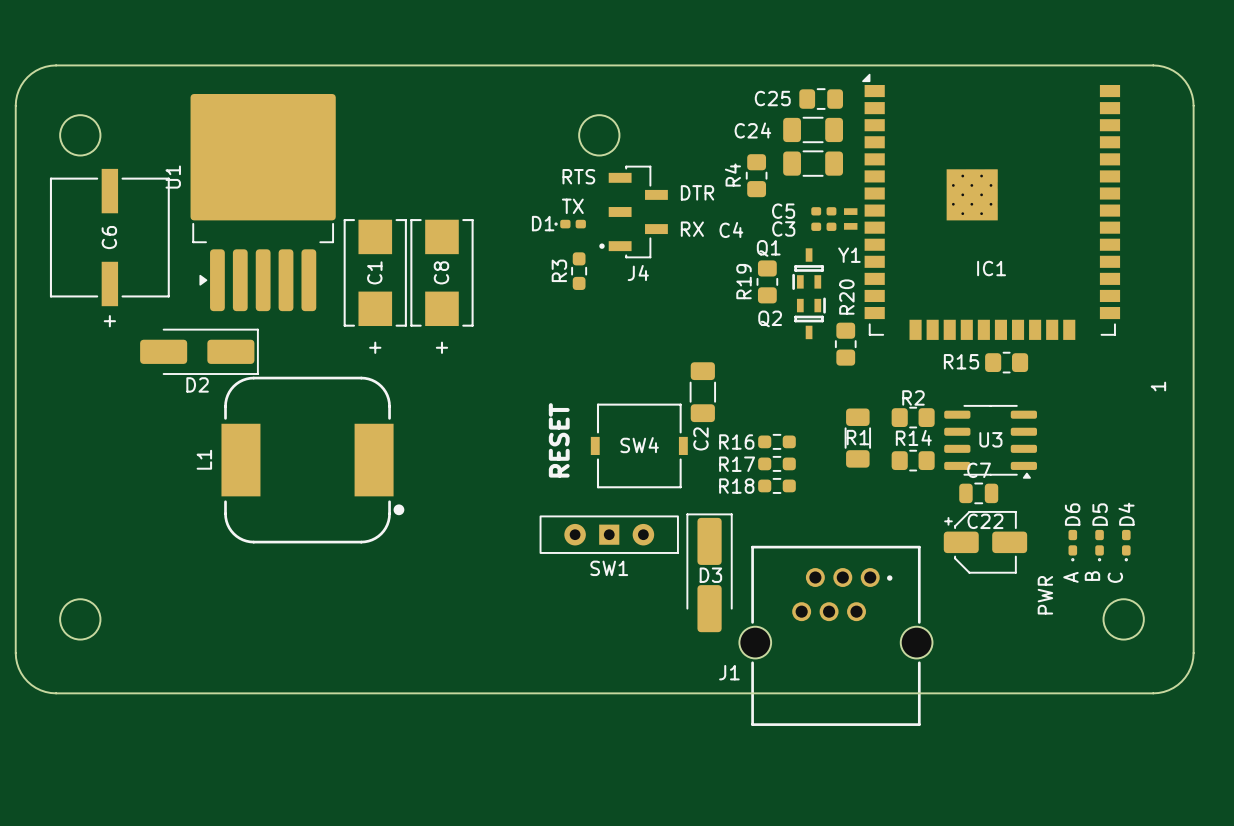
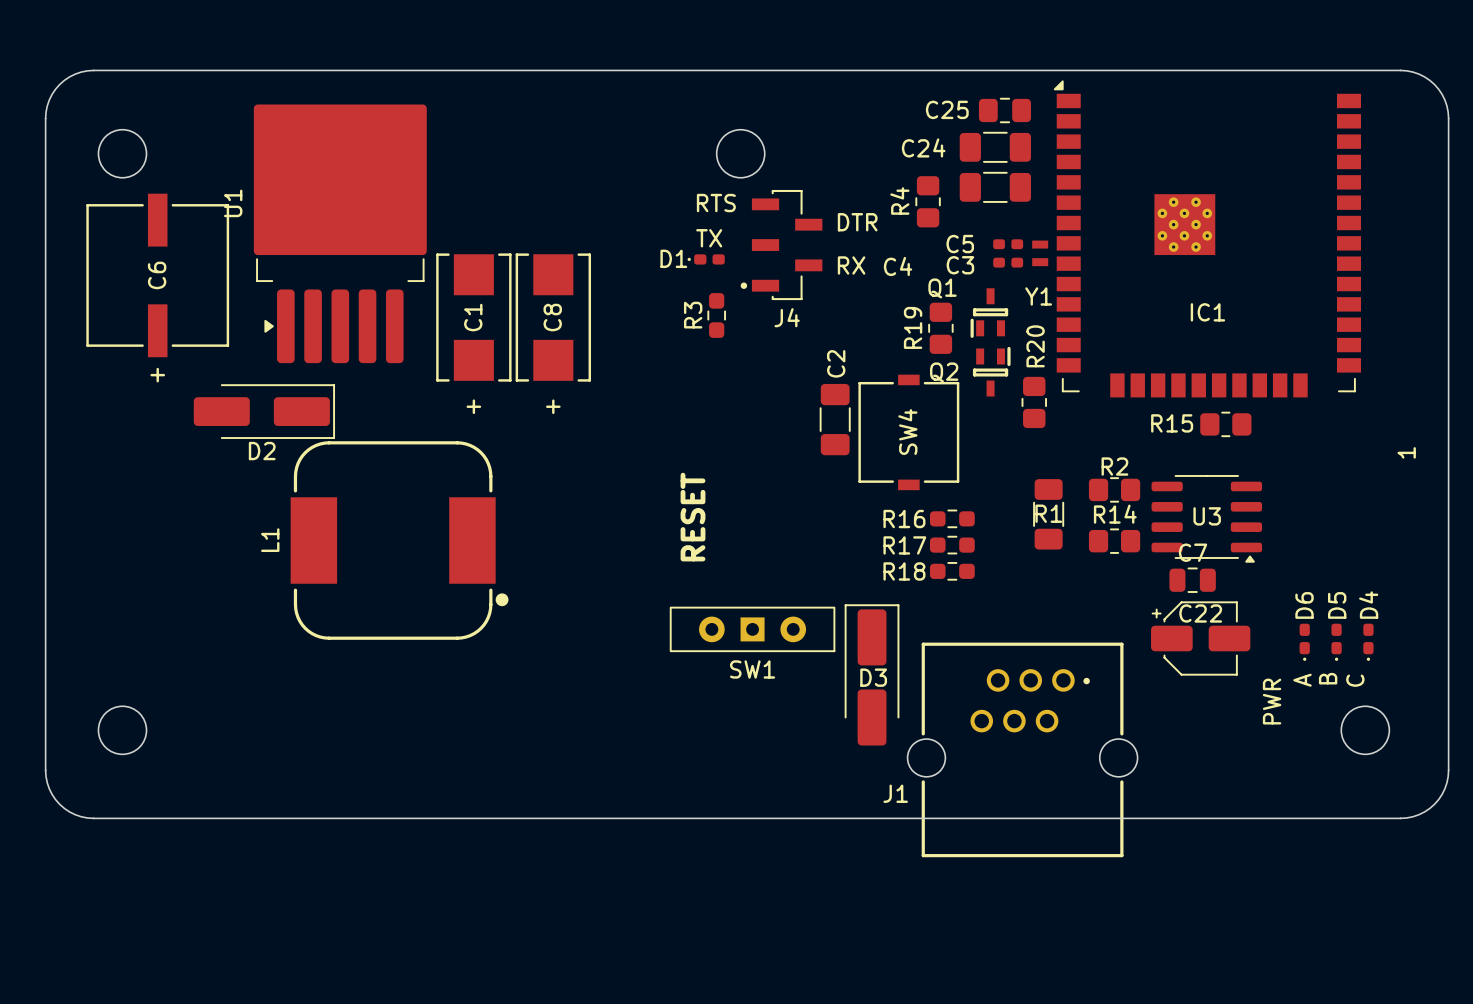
C2 position: (702, 392) -> (835, 419)
C2 name position: C2 (700, 438) -> C2 (836, 363)
SW4 rotation: 0° (639, 445) -> 90° clockwise (908, 432)
SW4 position: (639, 445) -> (908, 432)

